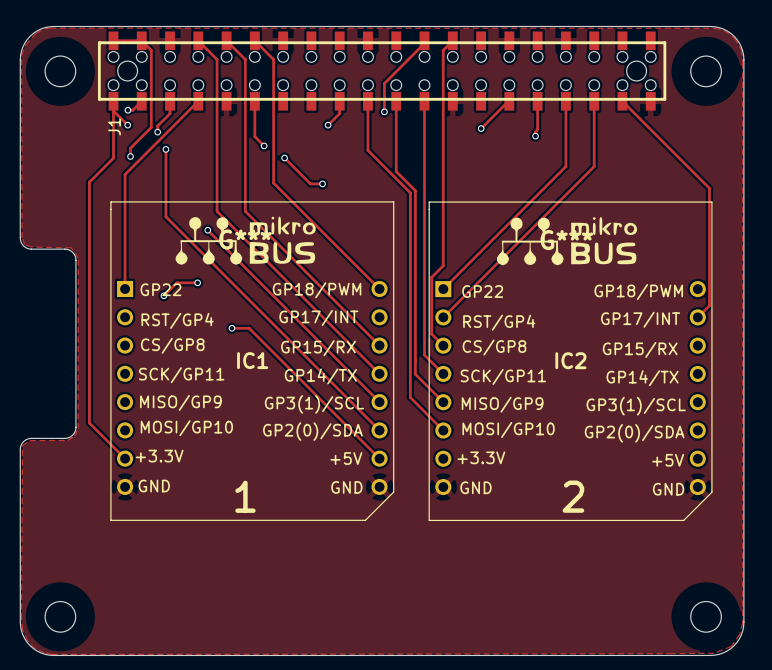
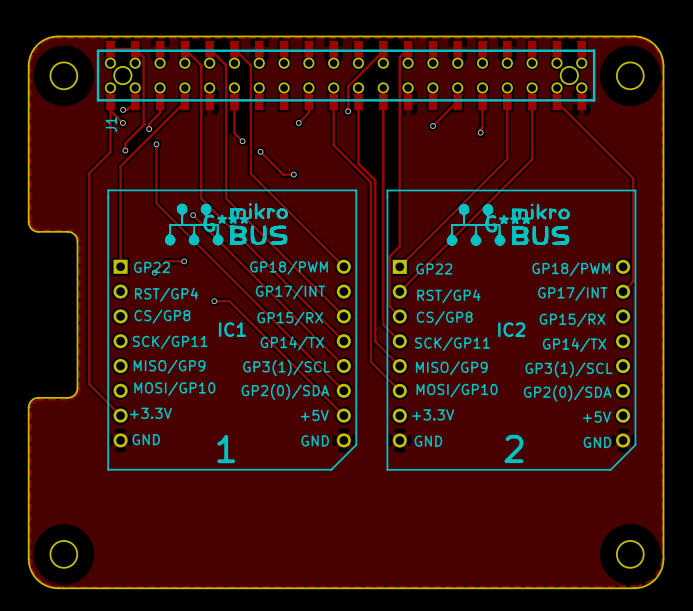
drawing: none -> [164, 203, 288, 246]
drawing: none -> [446, 203, 570, 246]

